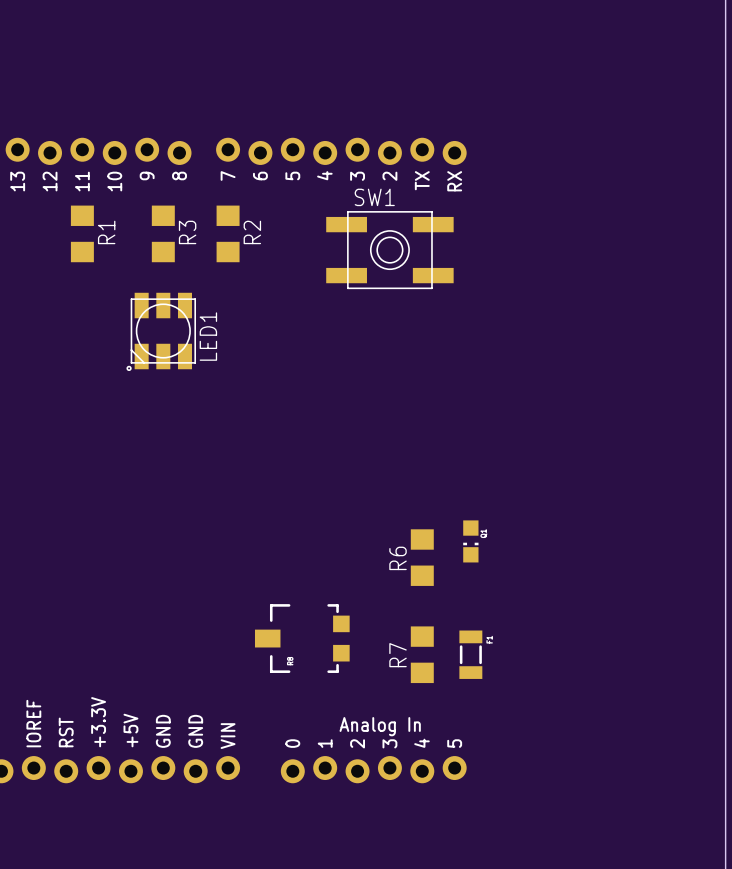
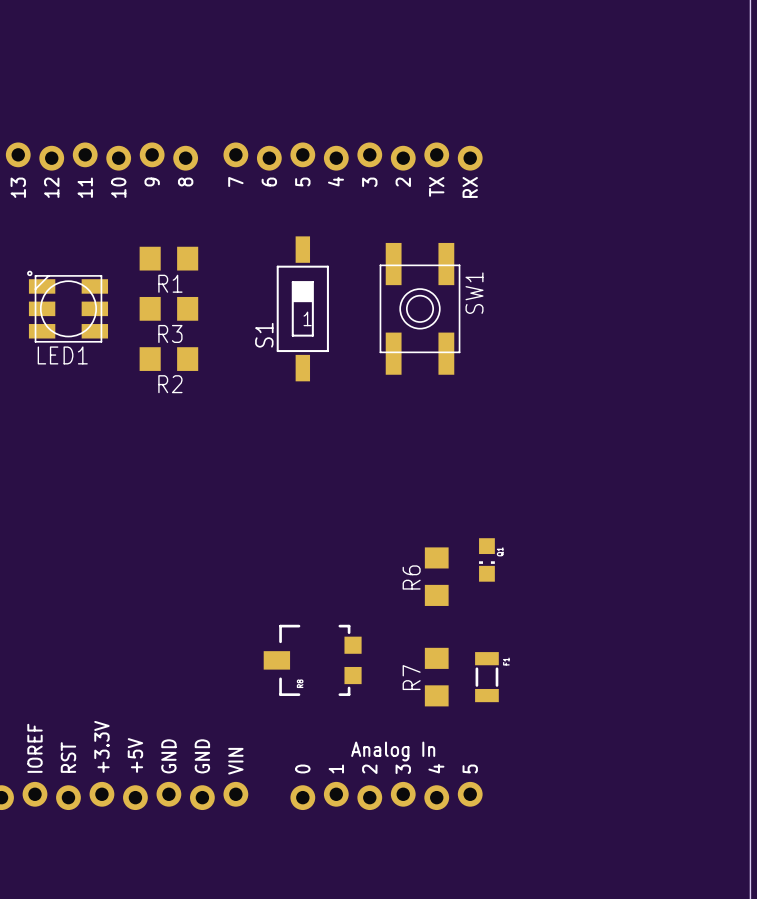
R1 rotation: 0° (82, 233) -> 90° clockwise (168, 258)
R1 position: (82, 233) -> (168, 258)
R3 rotation: 0° (163, 233) -> 90° clockwise (168, 308)
R3 position: (163, 233) -> (168, 308)
R2 rotation: 0° (228, 233) -> 90° clockwise (168, 359)
R2 position: (228, 233) -> (168, 359)
SW1 rotation: 0° (389, 250) -> 90° clockwise (420, 308)
S1: none -> (302, 308)
LED1 rotation: 0° (161, 331) -> 90° clockwise (67, 306)
LED1 position: (161, 331) -> (67, 306)

